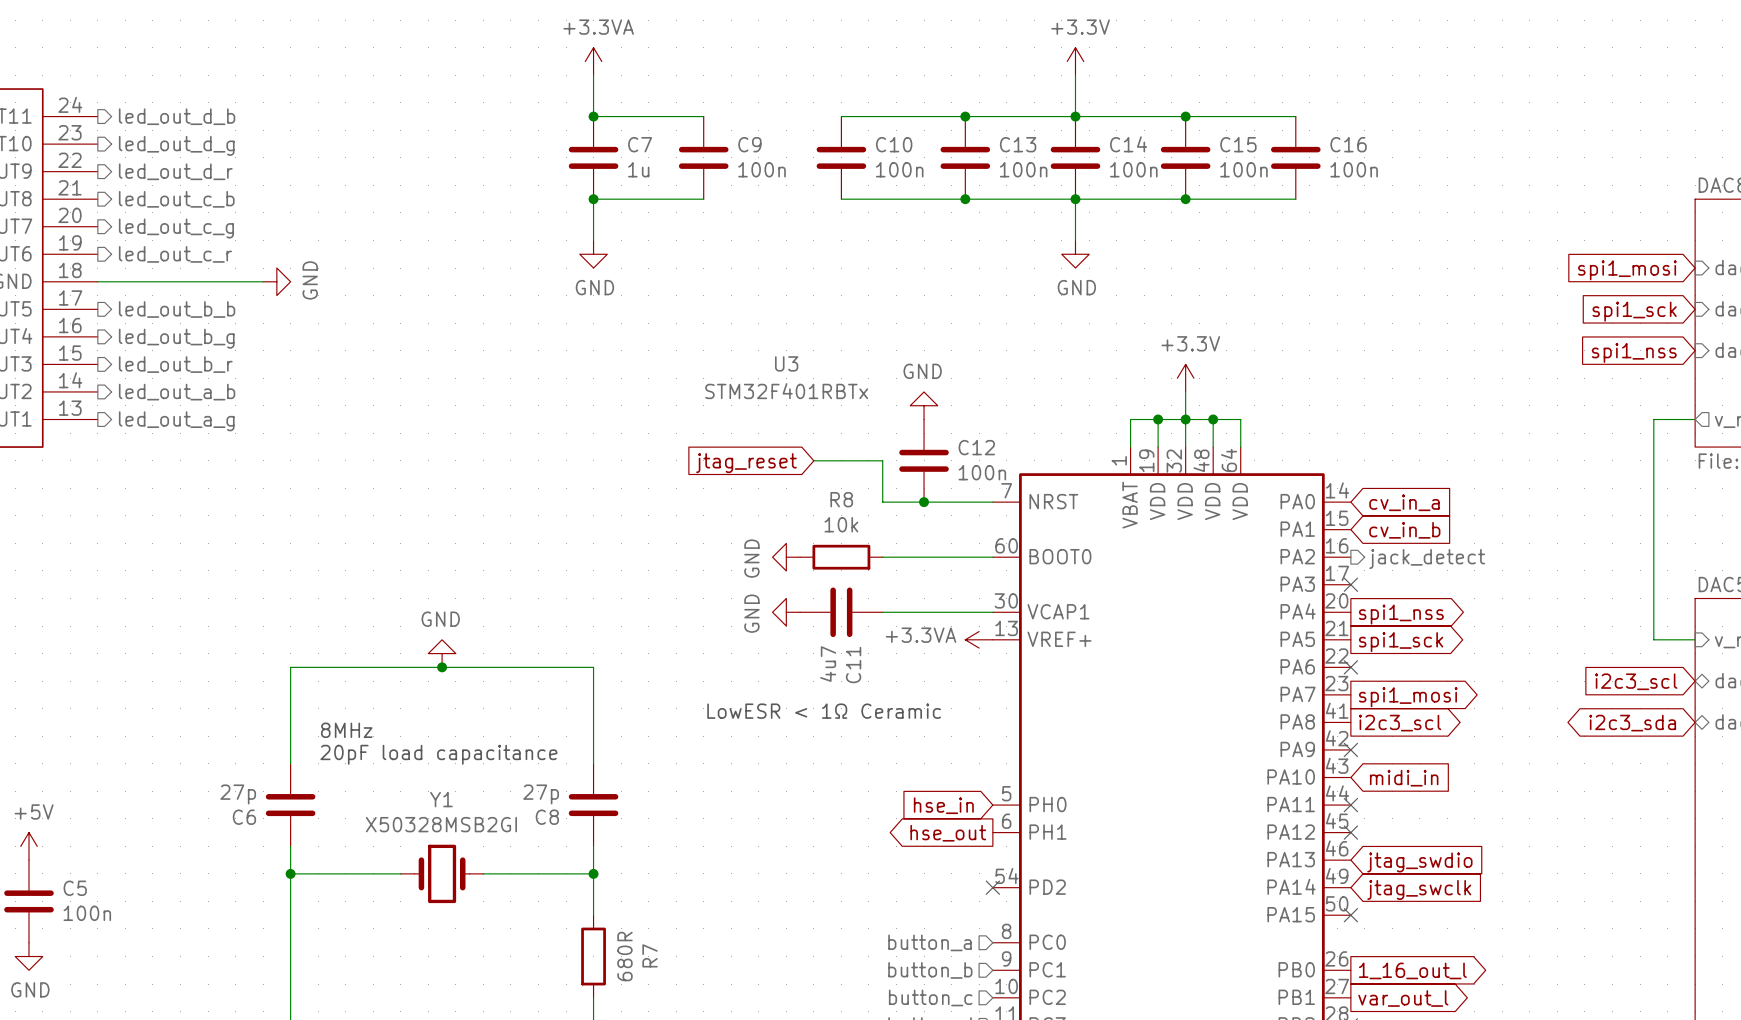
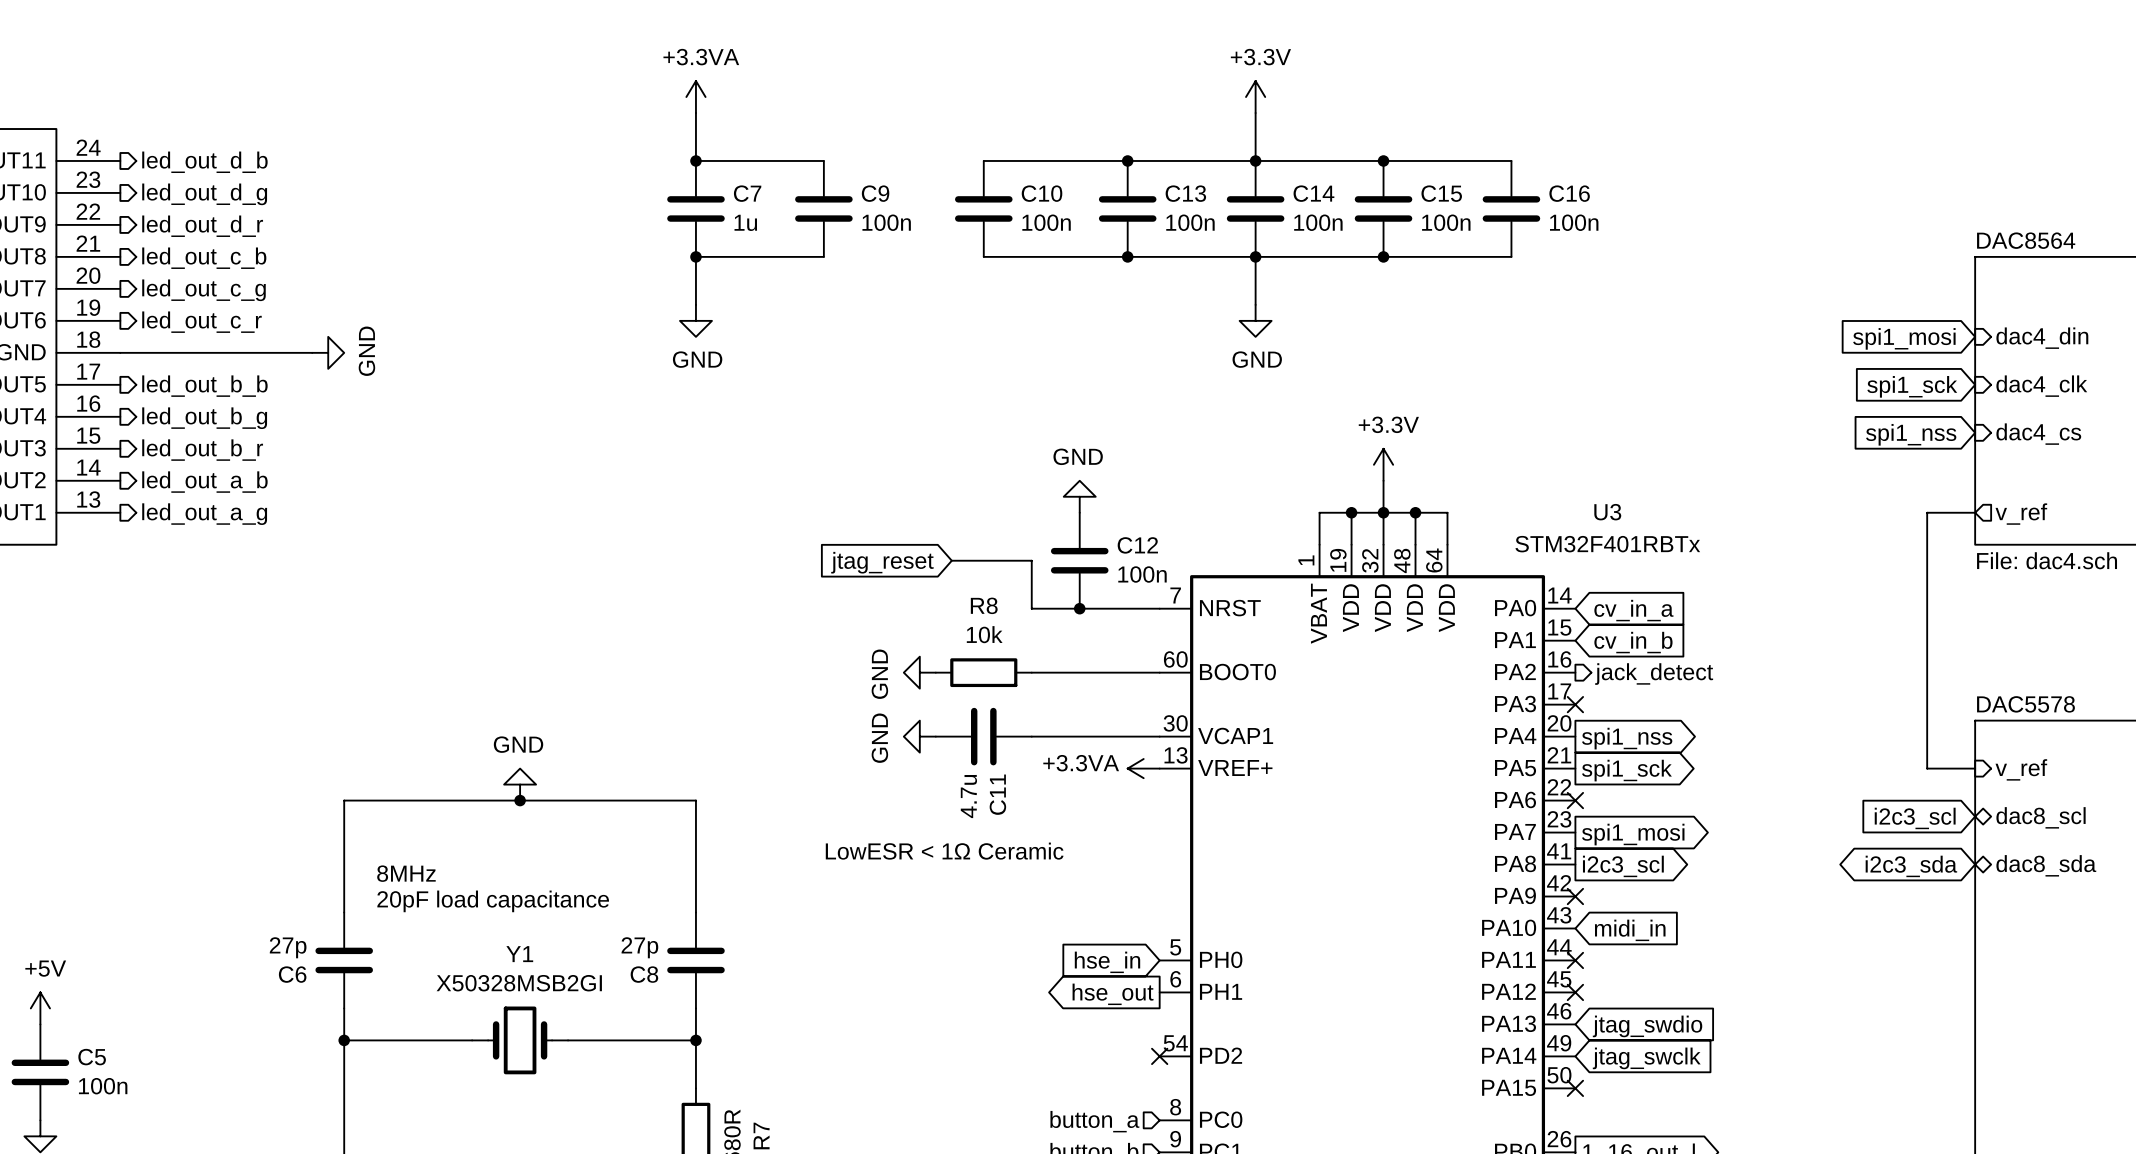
U3 name position: U3 (786, 363) -> U3 (1607, 512)
U3 value position: STM32F401RBTx (786, 391) -> STM32F401RBTx (1607, 544)
C11 value: 4u7 (828, 664) -> 4.7u (968, 796)

